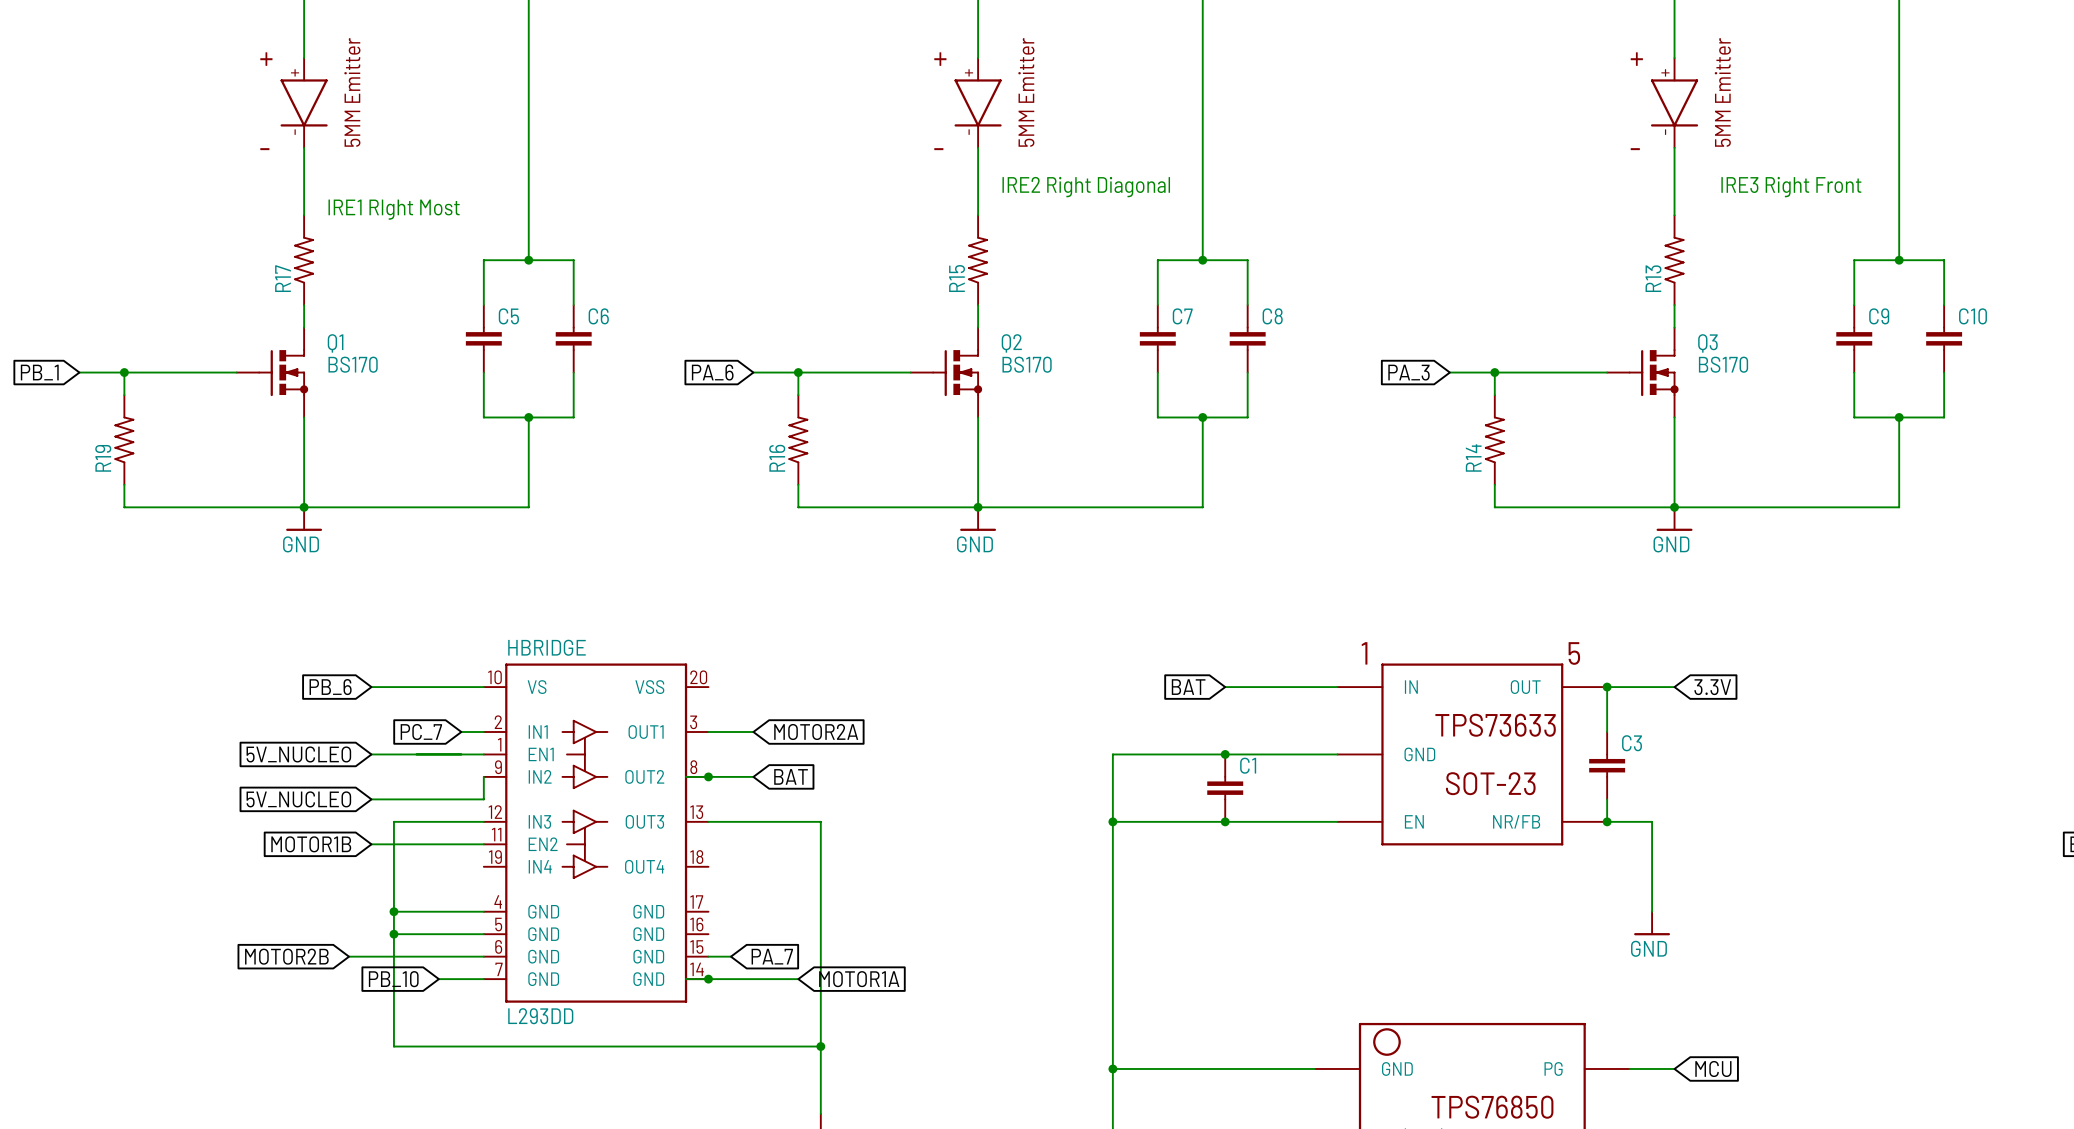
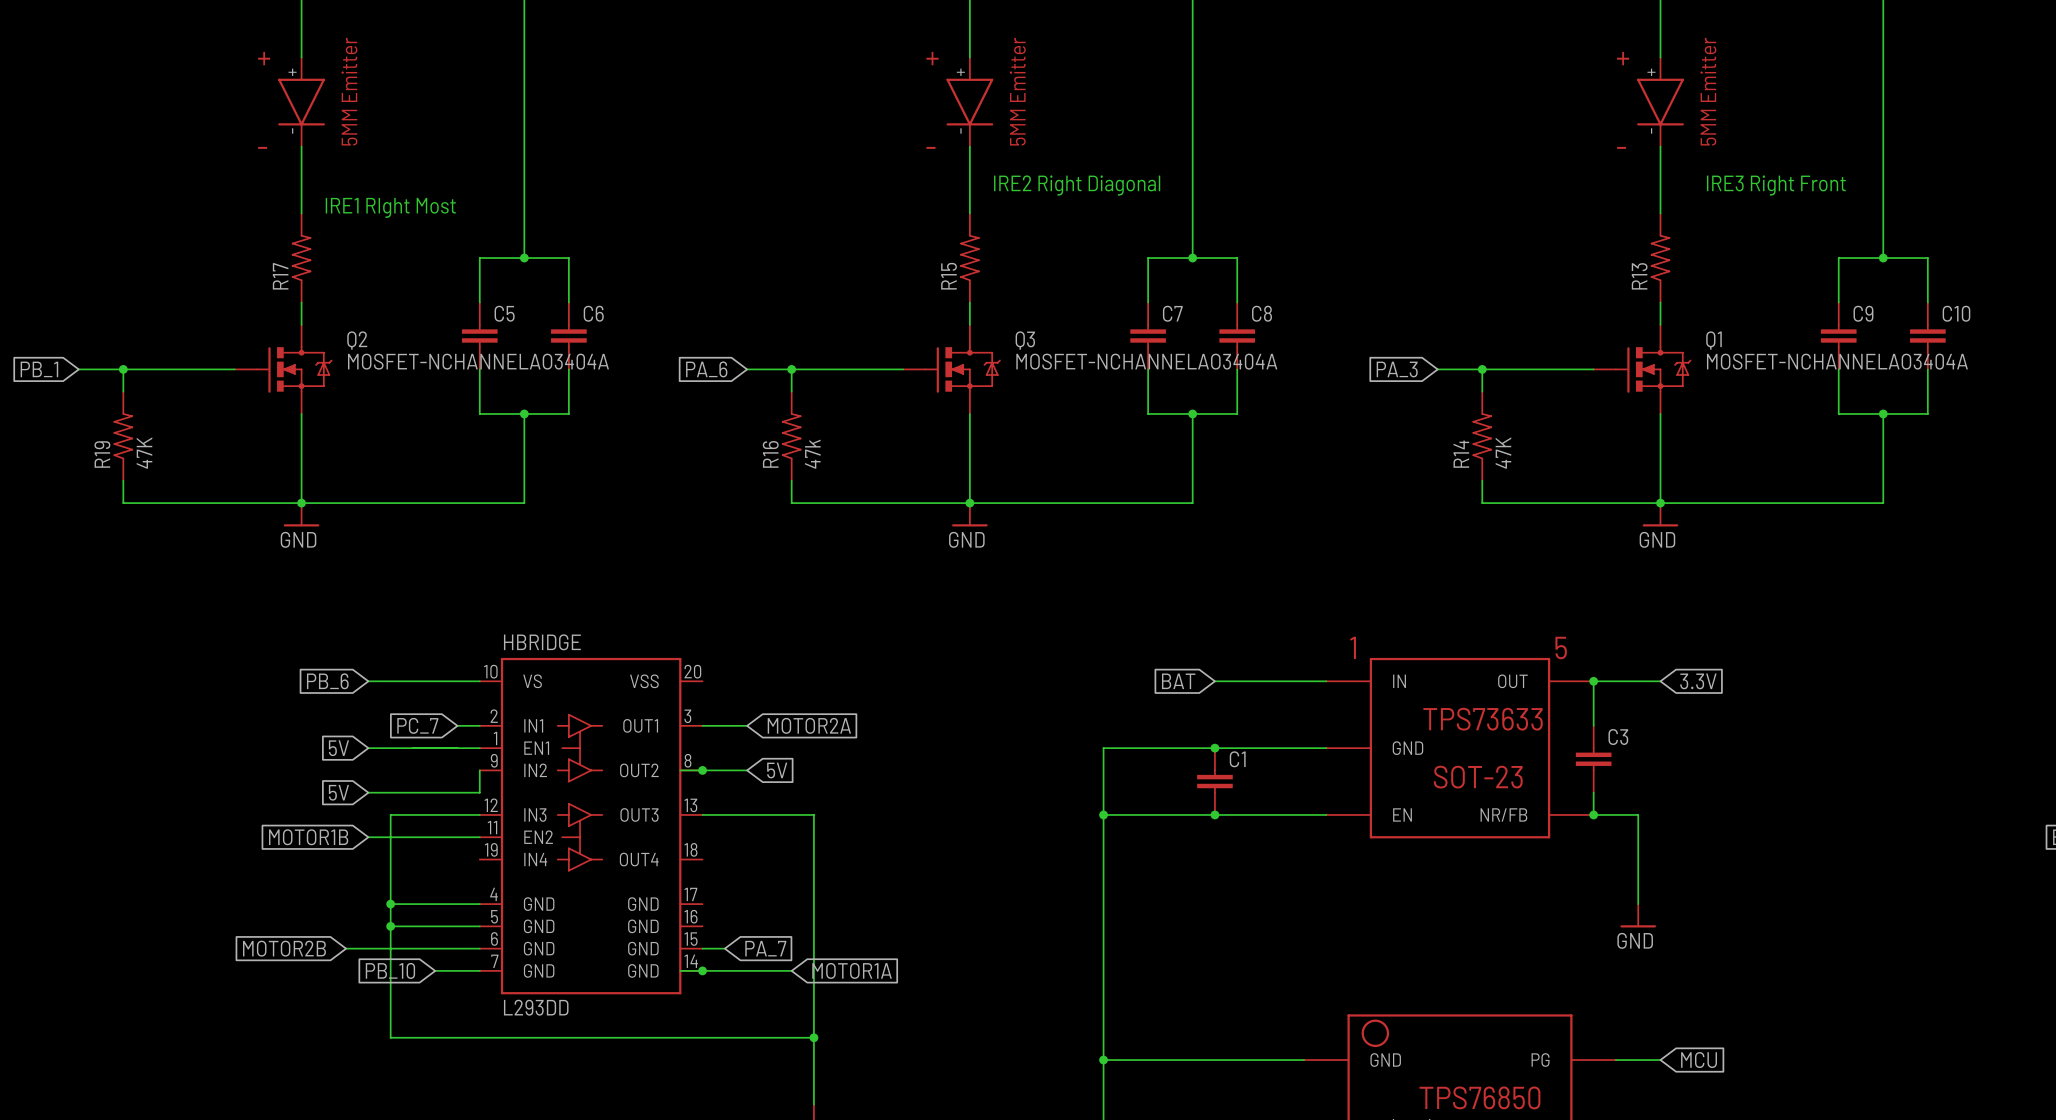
Q1 symbol: [236, 327, 309, 418] -> [1593, 324, 1692, 414]
Q2 symbol: [910, 327, 983, 418] -> [234, 324, 333, 414]
Q3 symbol: [1607, 327, 1679, 418] -> [903, 324, 1001, 414]
Q1 value: BS170 (353, 364) -> MOSFET-NCHANNELAO3404A (1837, 361)
Q2 value: BS170 (1027, 364) -> MOSFET-NCHANNELAO3404A (478, 361)
Q3 value: BS170 (1723, 364) -> MOSFET-NCHANNELAO3404A (1146, 361)
R19 value: none -> 47K (144, 453)
R14 value: none -> 47K (1503, 453)
R16 value: none -> 47k (812, 454)
global label: 5V_NUCLEO (298, 754) -> 5V (338, 748)
global label: BAT (791, 776) -> 5V (777, 770)
global label: 5V_NUCLEO (298, 799) -> 5V (338, 792)

